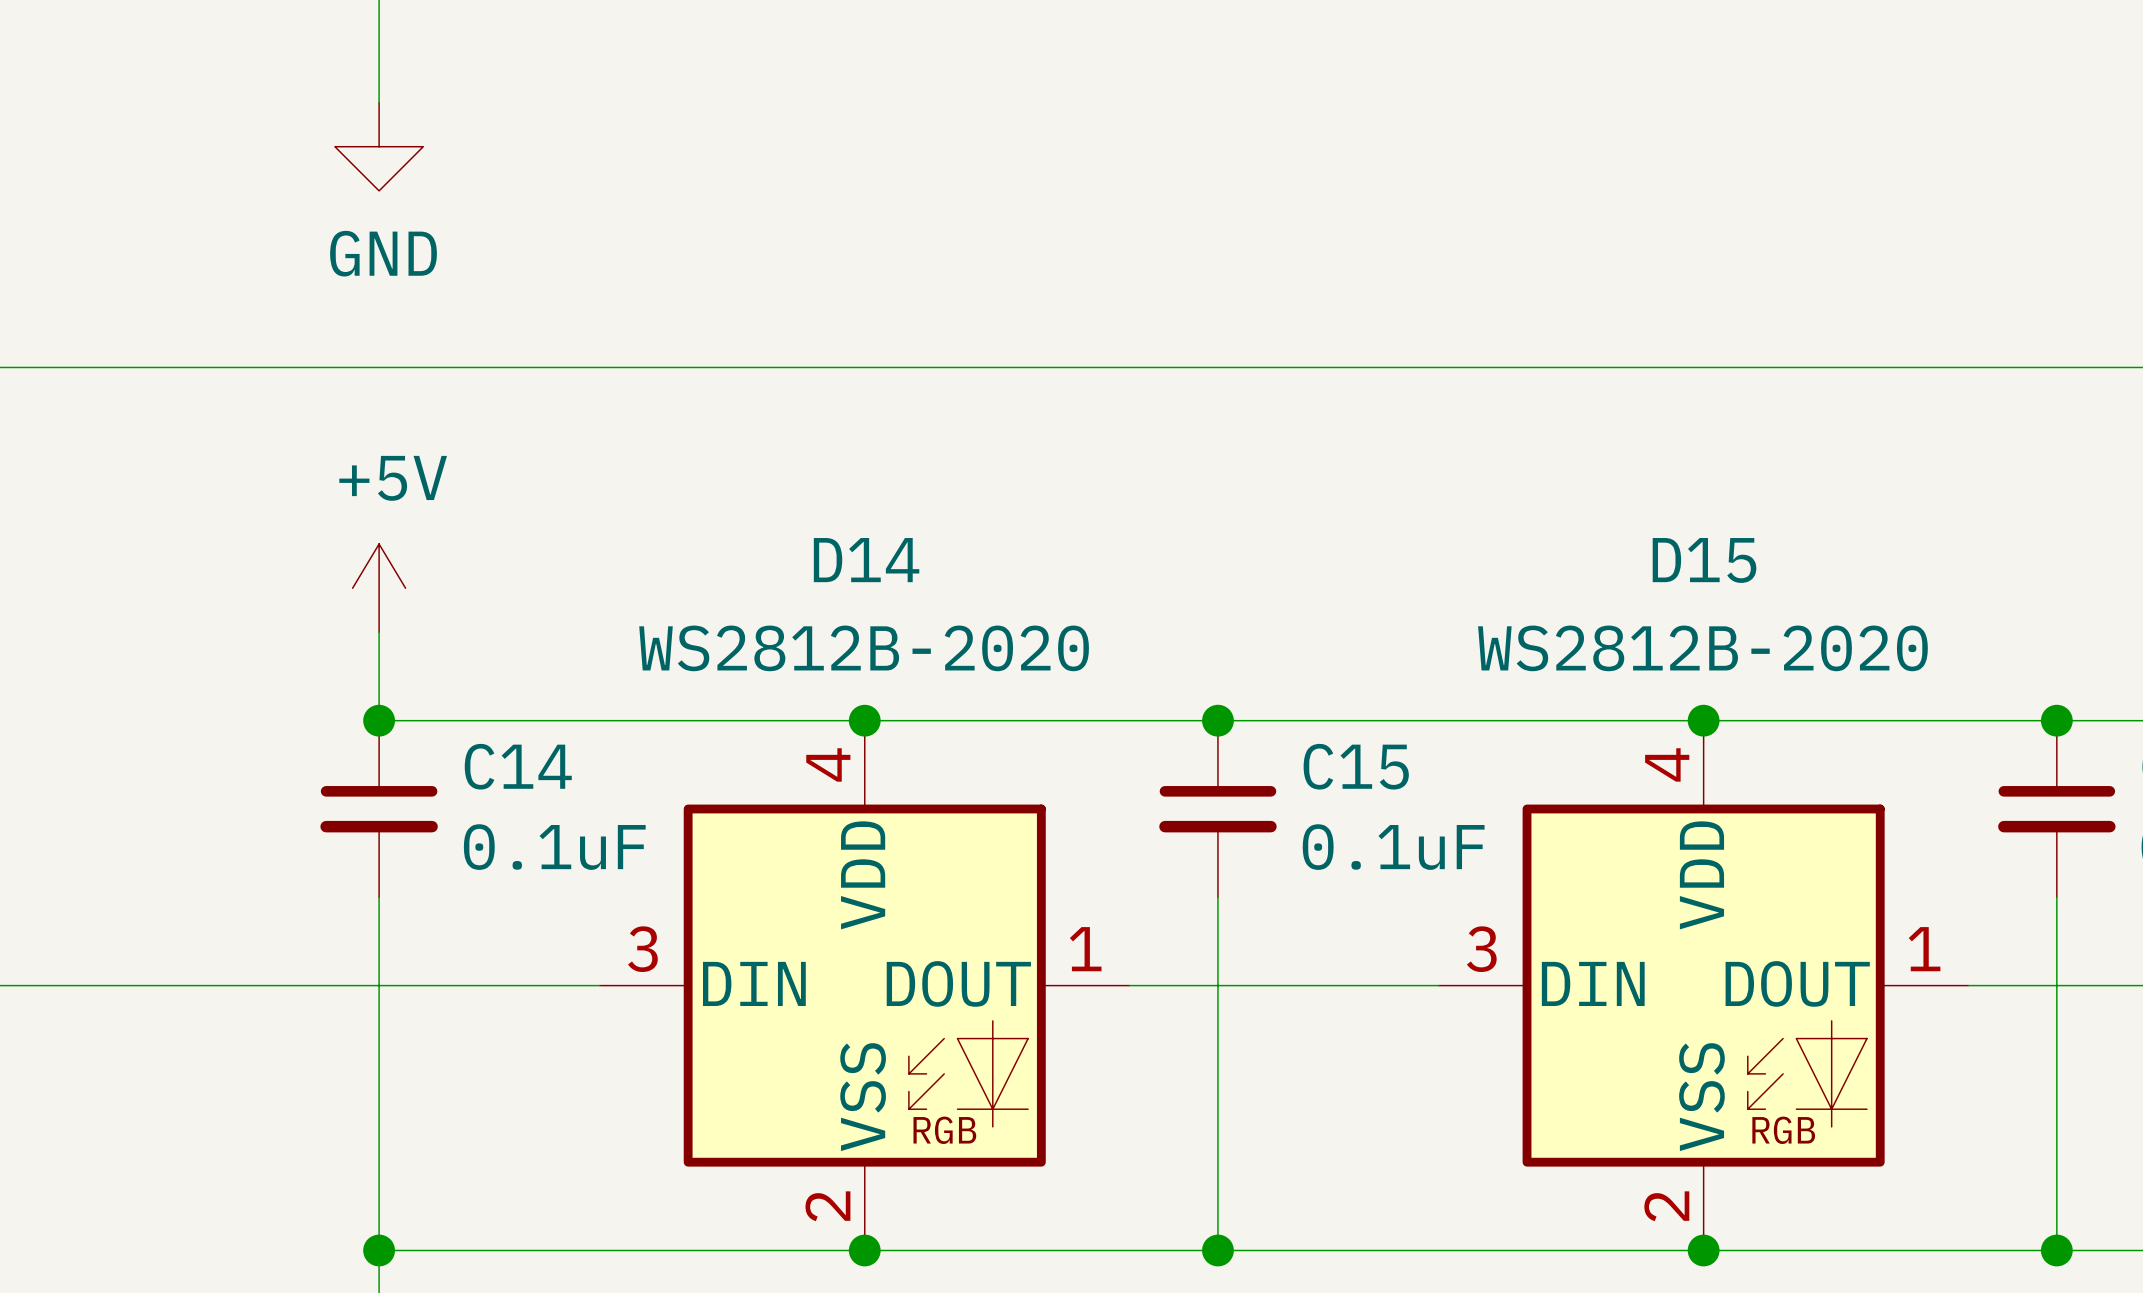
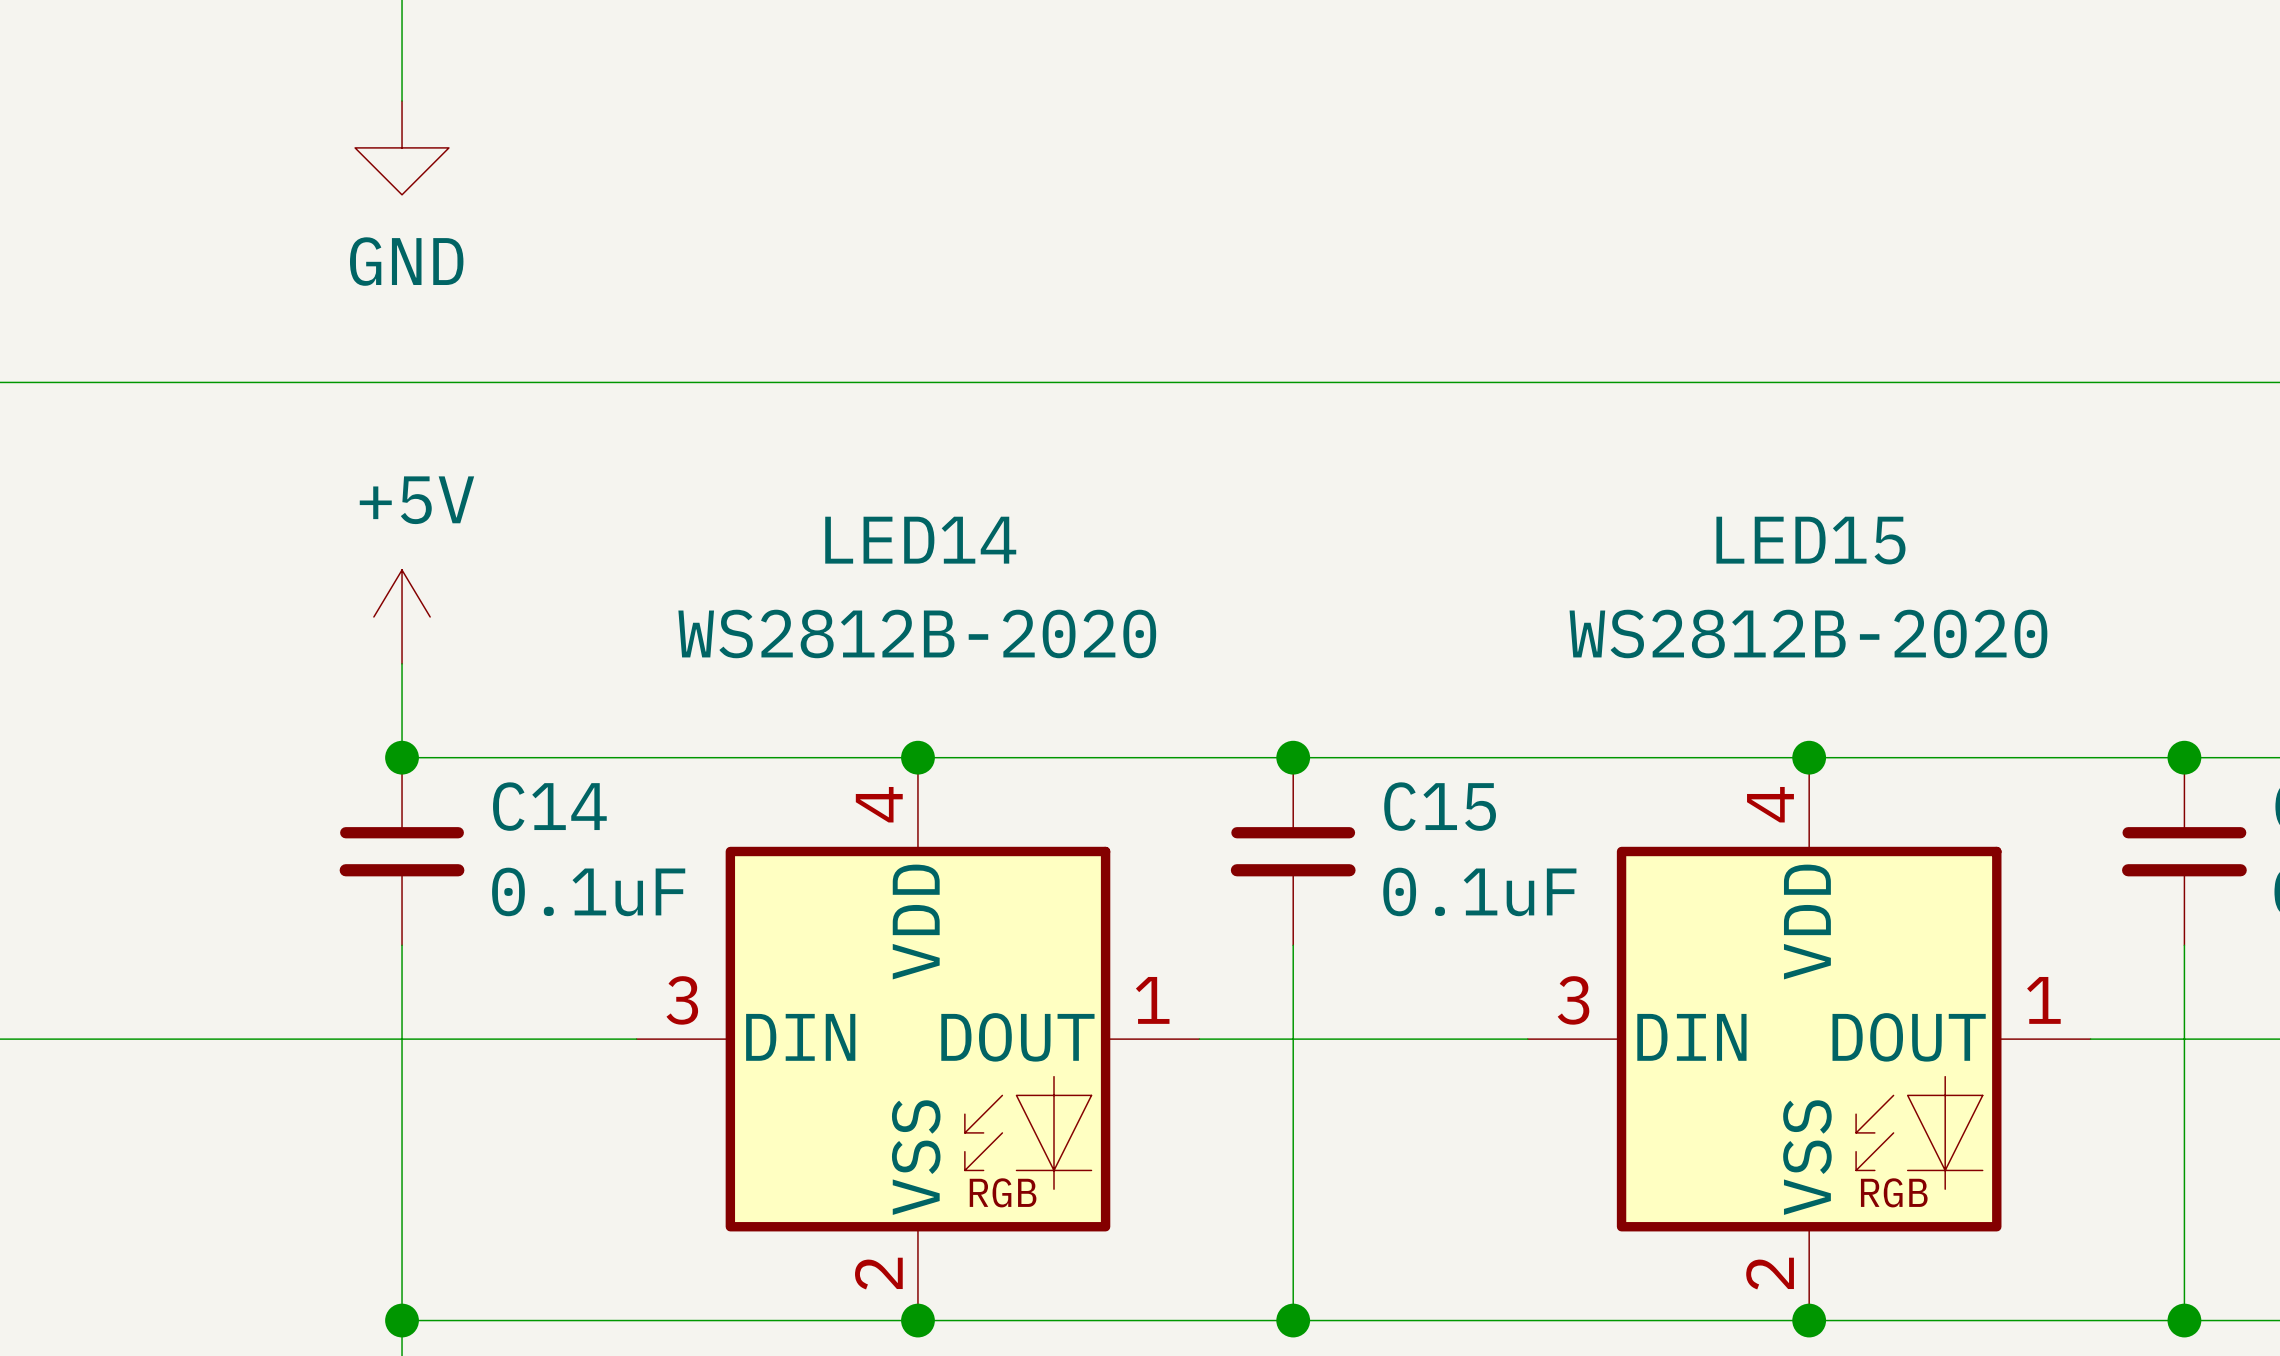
D14 name: D14 (866, 560) -> LED14 (920, 540)
D15 name: D15 (1704, 560) -> LED15 (1810, 540)
D14 value position: WS2812B-2020 (864, 648) -> WS2812B-2020 (917, 633)
D15 value position: WS2812B-2020 (1702, 648) -> WS2812B-2020 (1808, 633)

